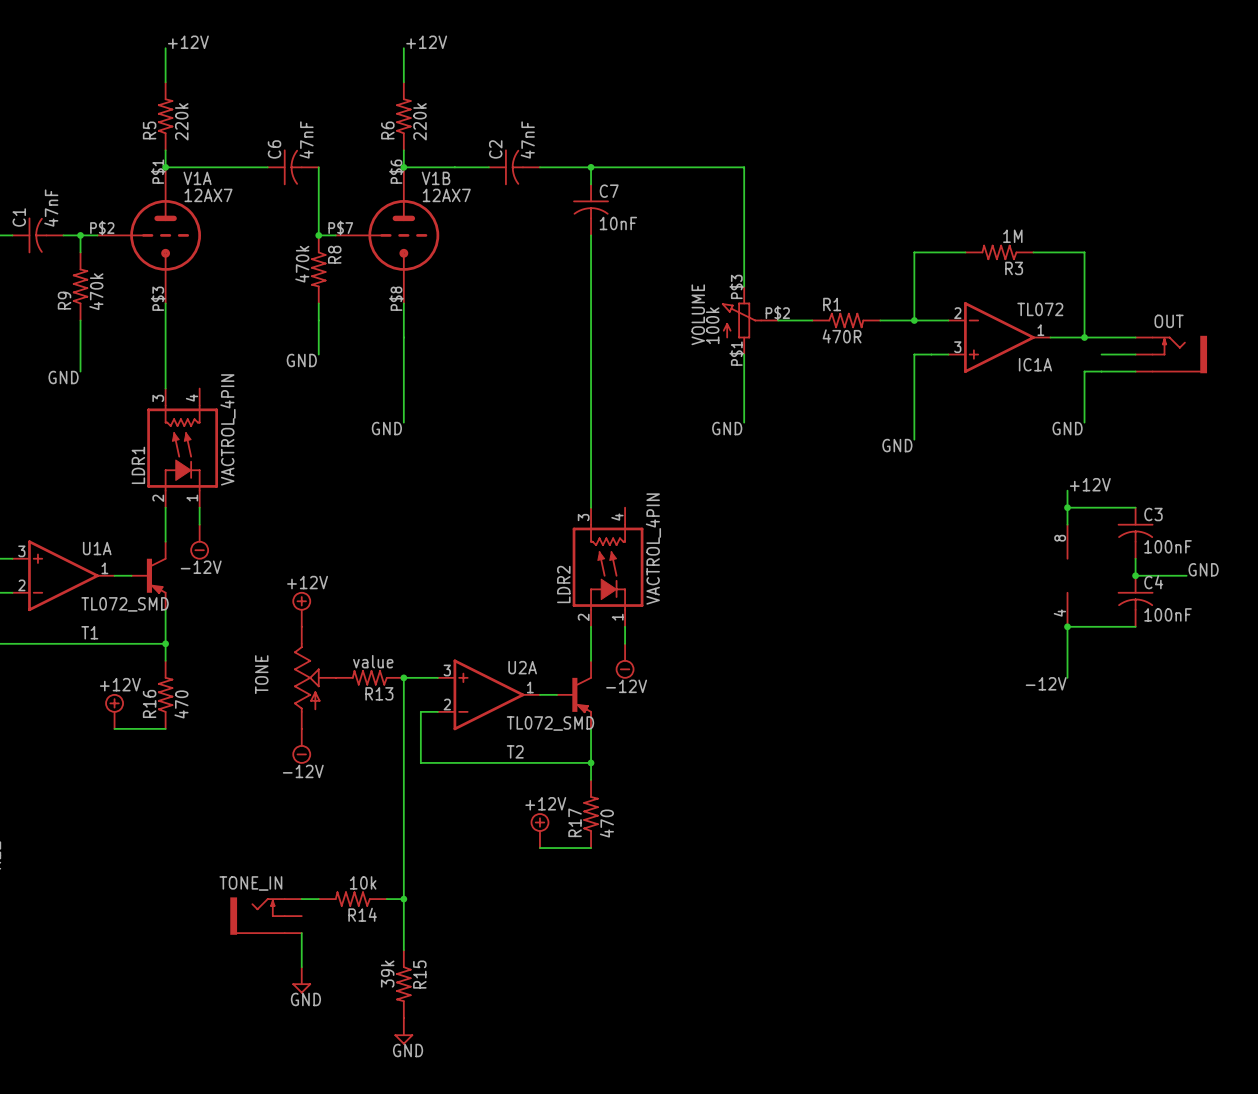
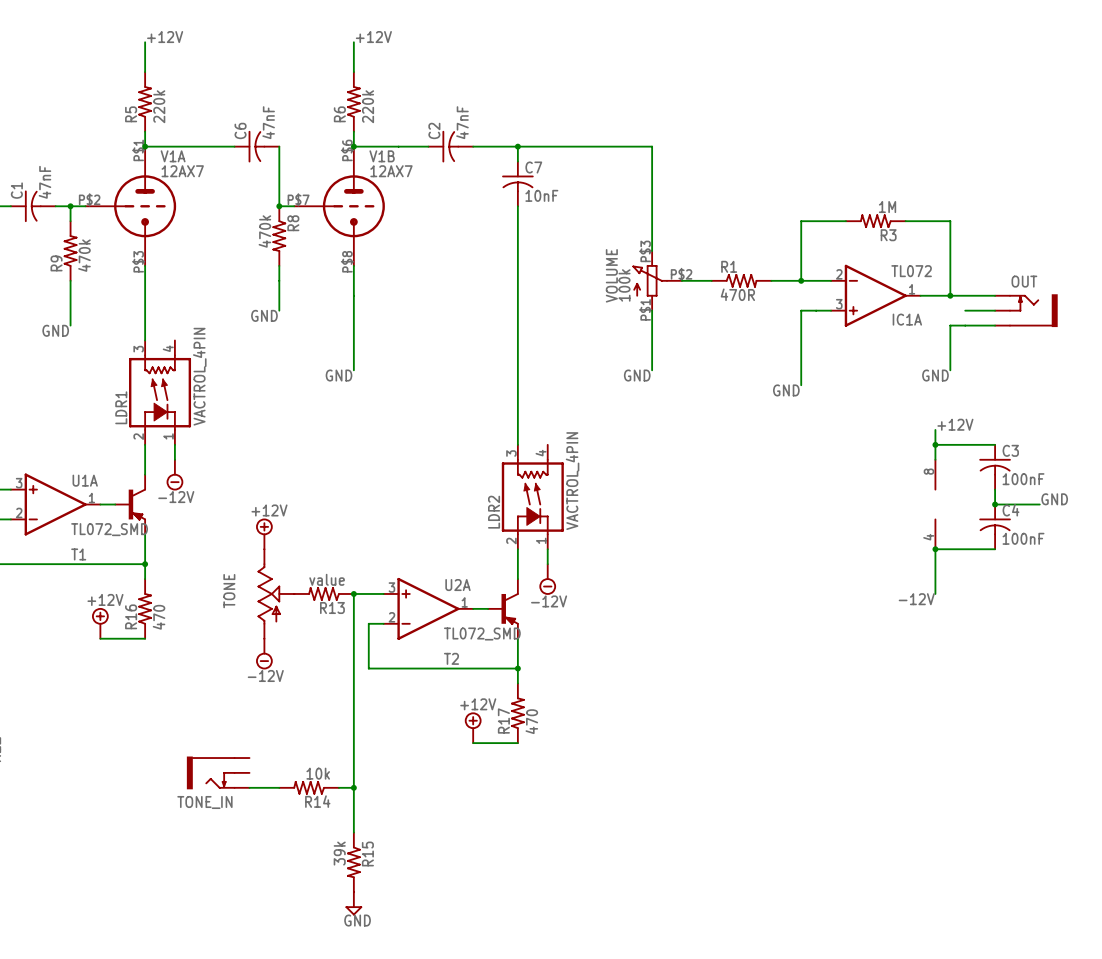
TONE_IN: none -> (218, 772)
TONE_IN: (266, 916) -> none
wire: (301, 933) (301, 967) -> none
power symbol: GND (301, 980) -> none

